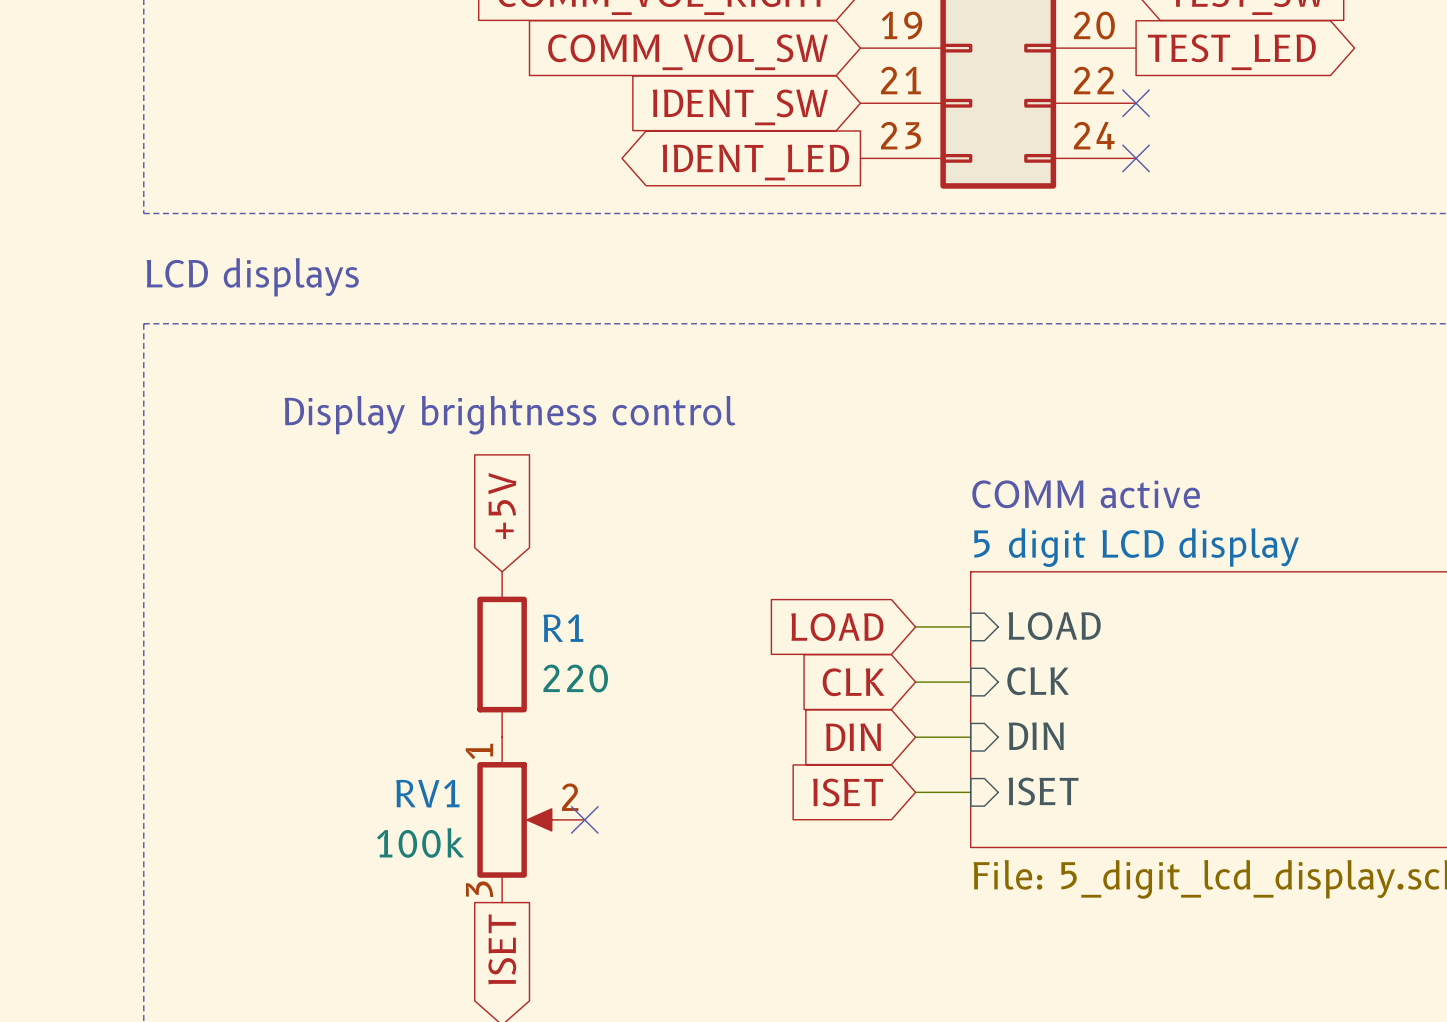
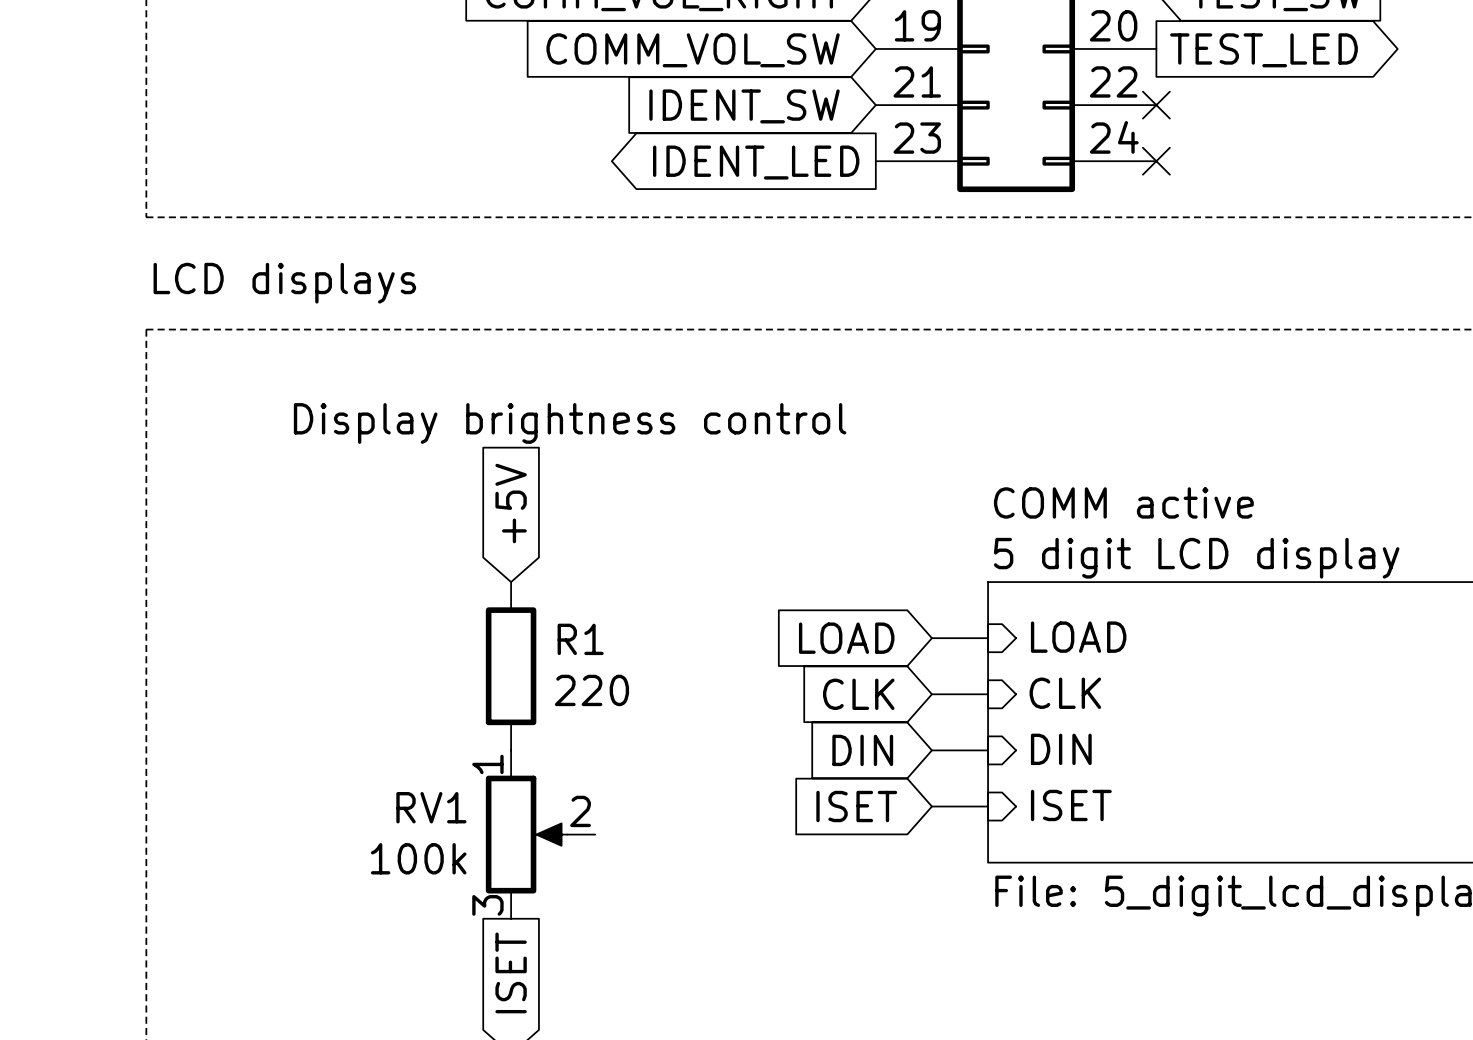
no-connect mark: (584, 819) -> none

